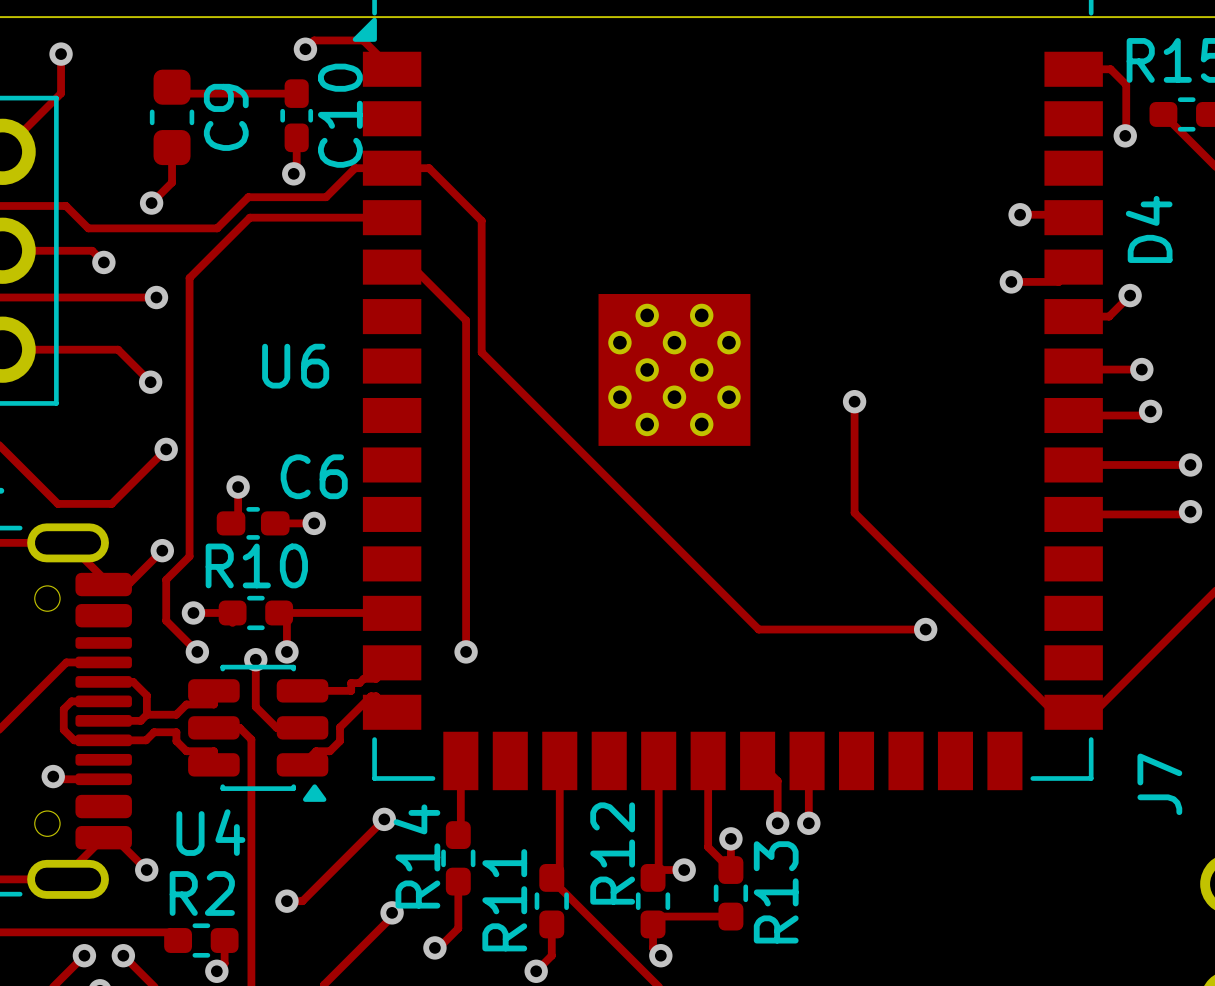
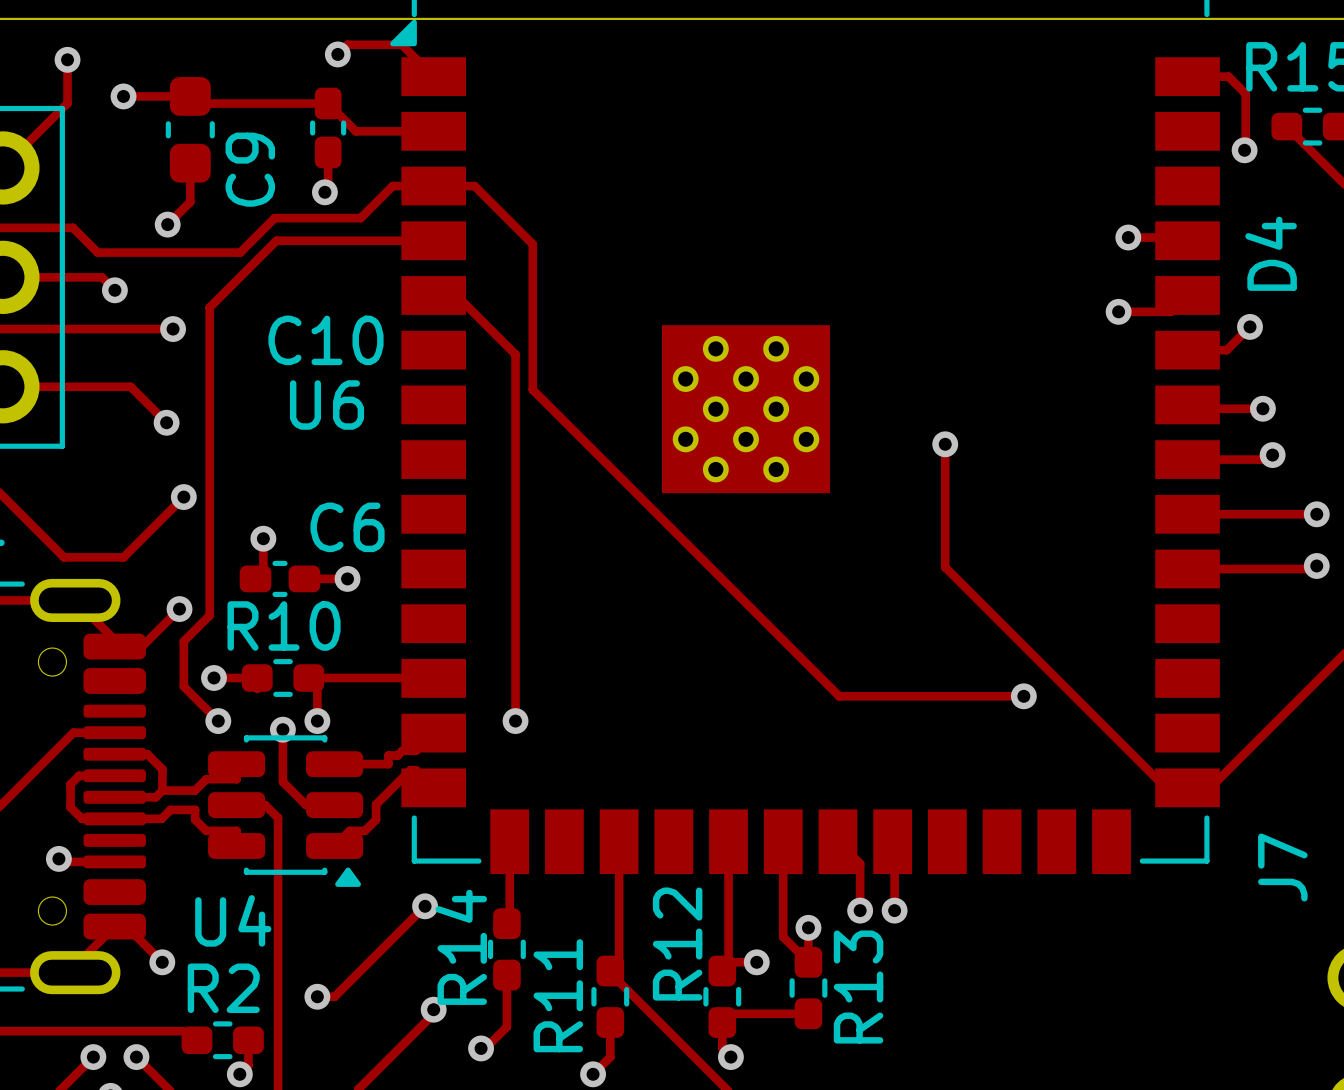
track: none -> (123, 96) (190, 96)
via: none -> (123, 96)
track: none -> (328, 103) (355, 131) (433, 131)
C10 name rotation: 0° (340, 115) -> 90° clockwise (325, 340)
C10 name position: C10 (340, 115) -> C10 (325, 340)
C9 name position: C9 (226, 117) -> C9 (250, 169)

